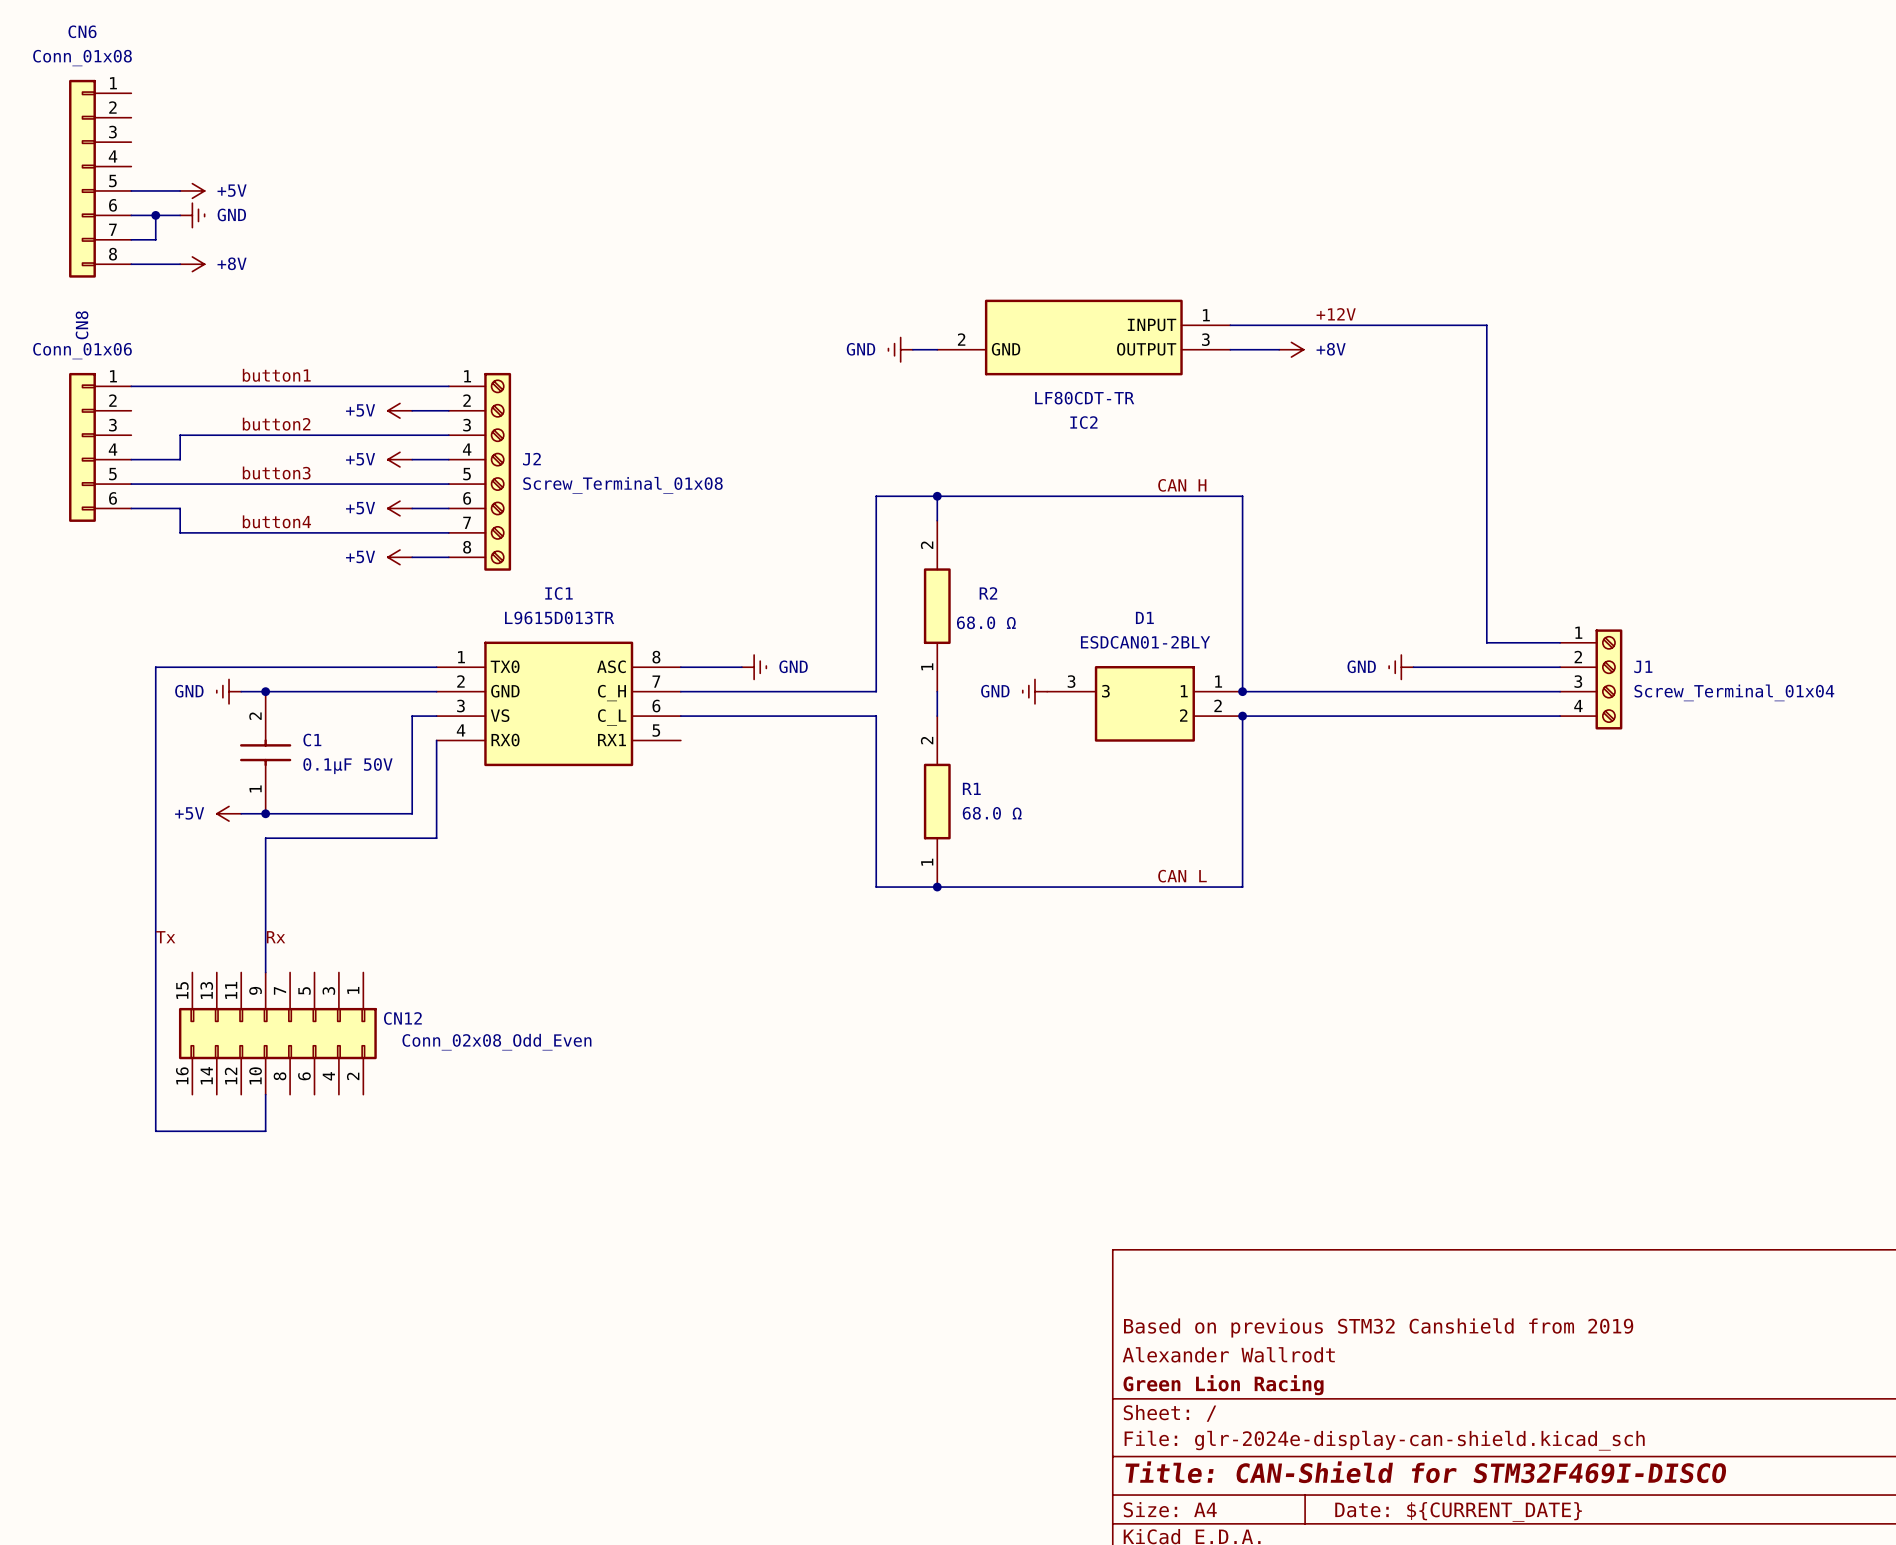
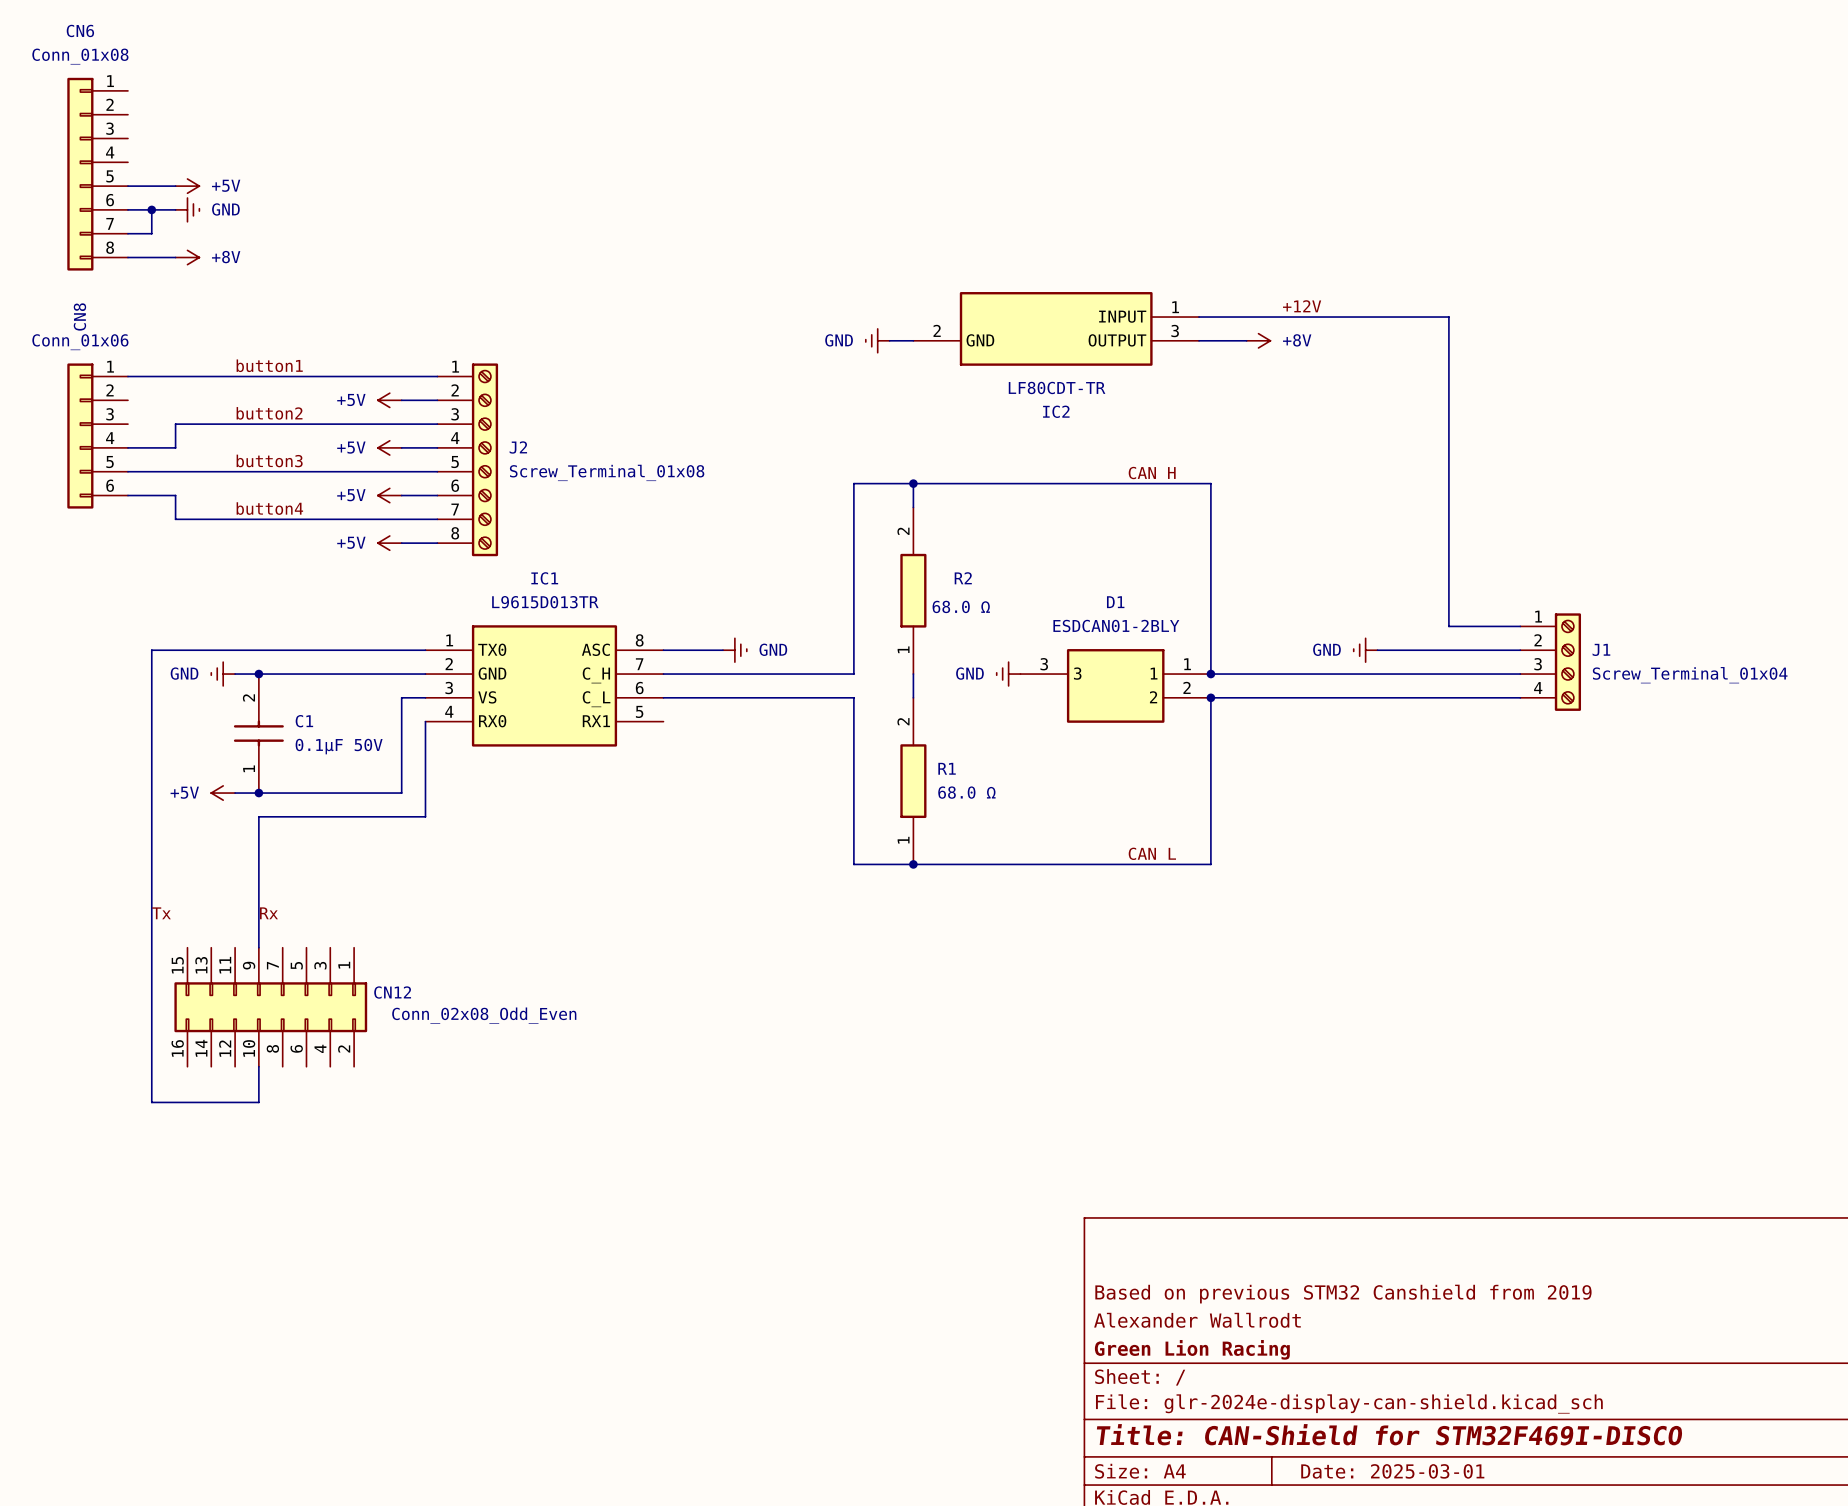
title block: Date: ${CURRENT_DATE} (1458, 1511) -> Date: 2025-03-01 (1392, 1471)

